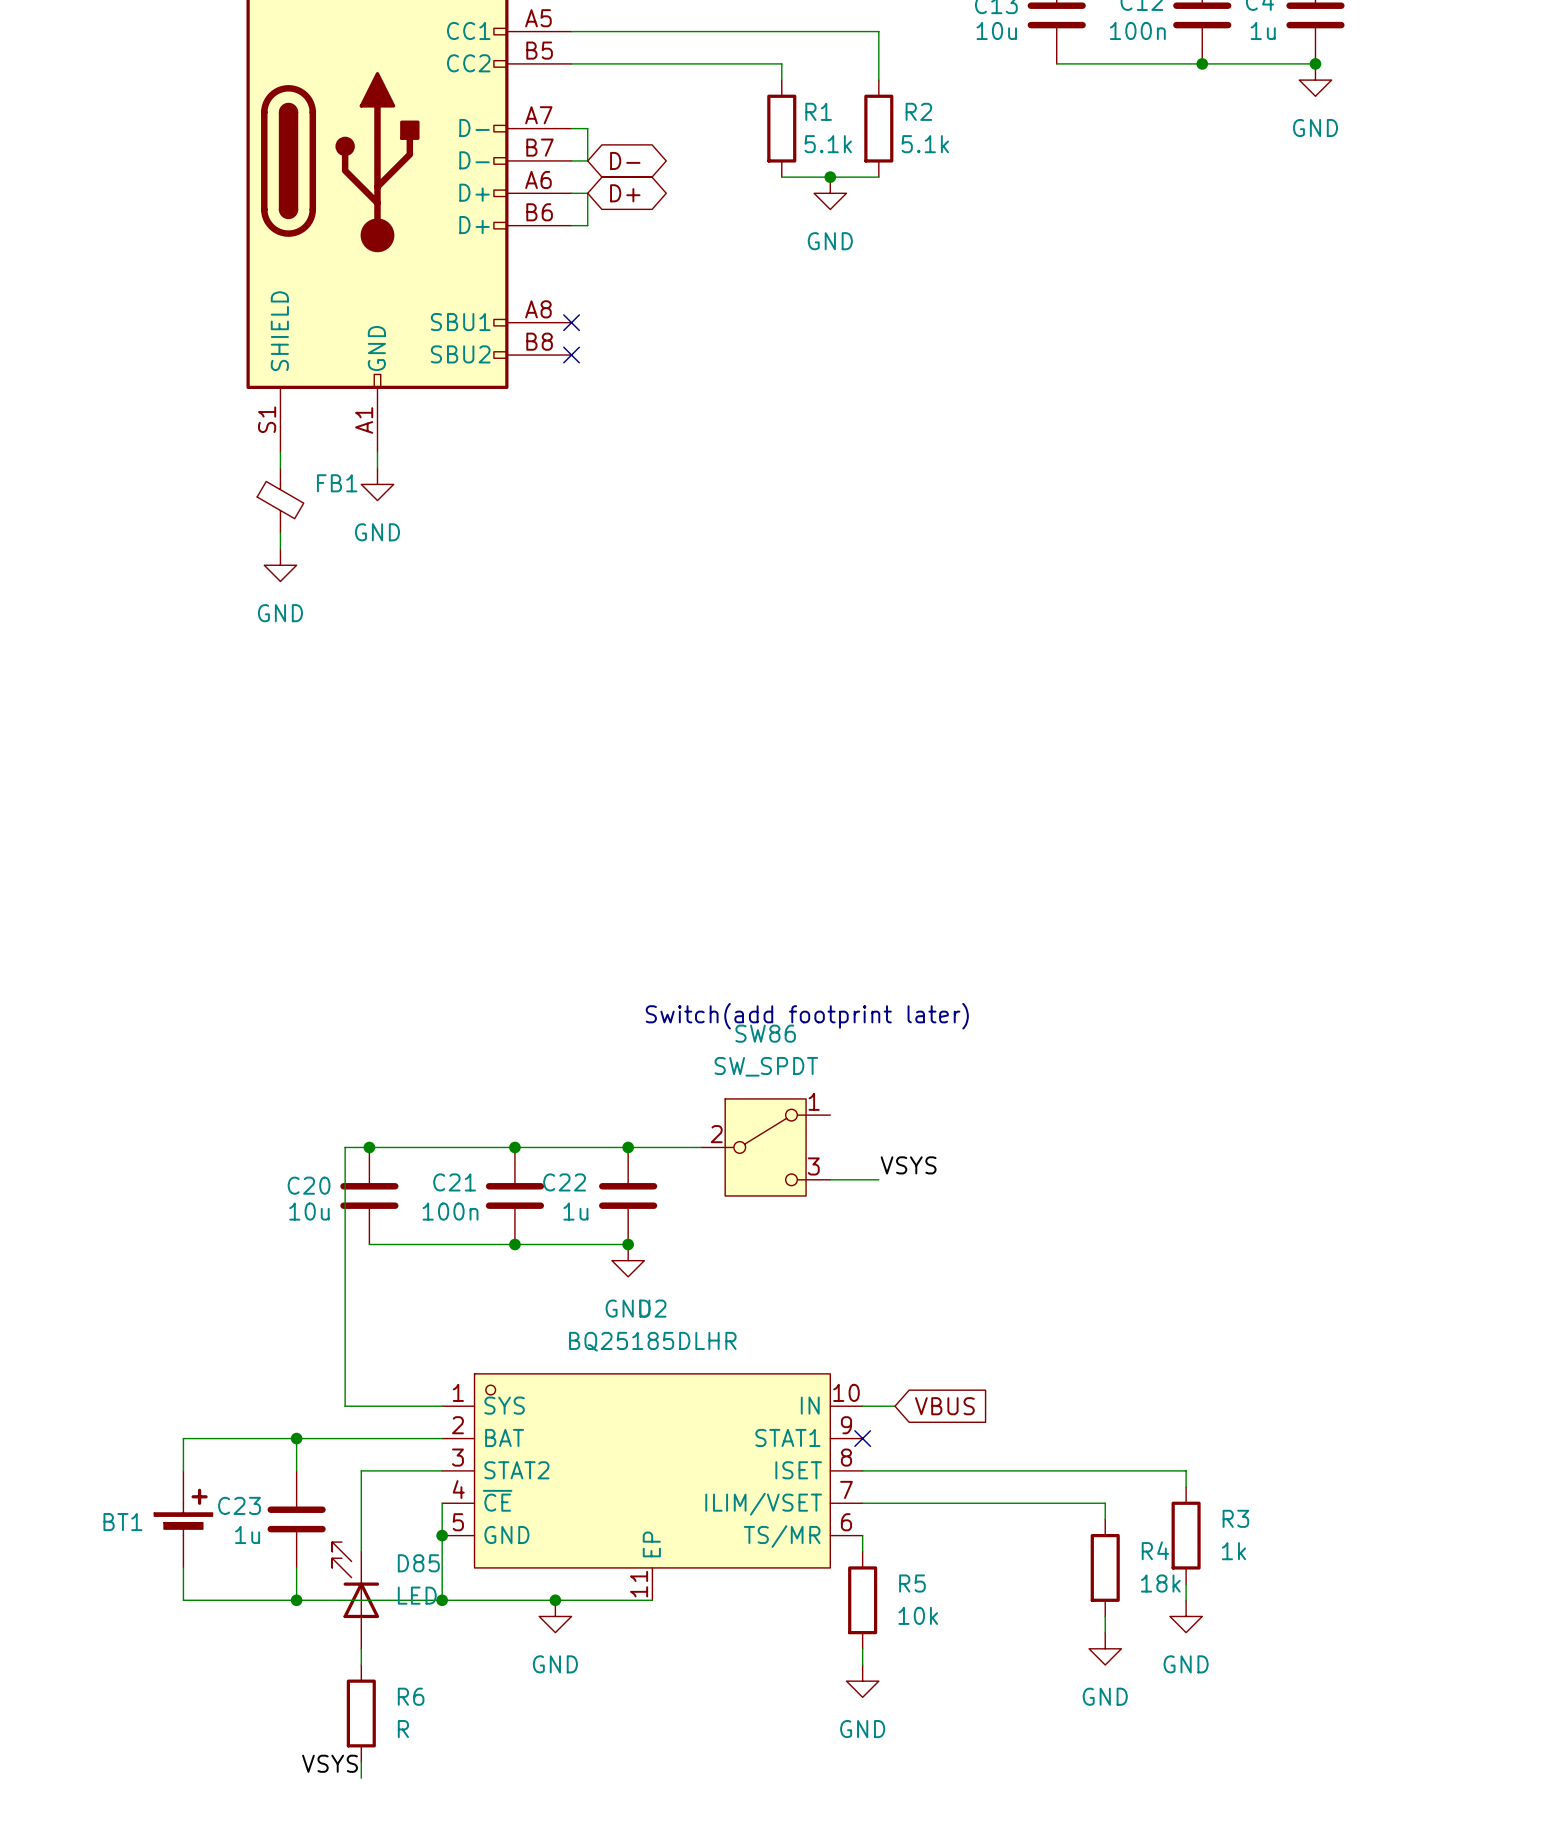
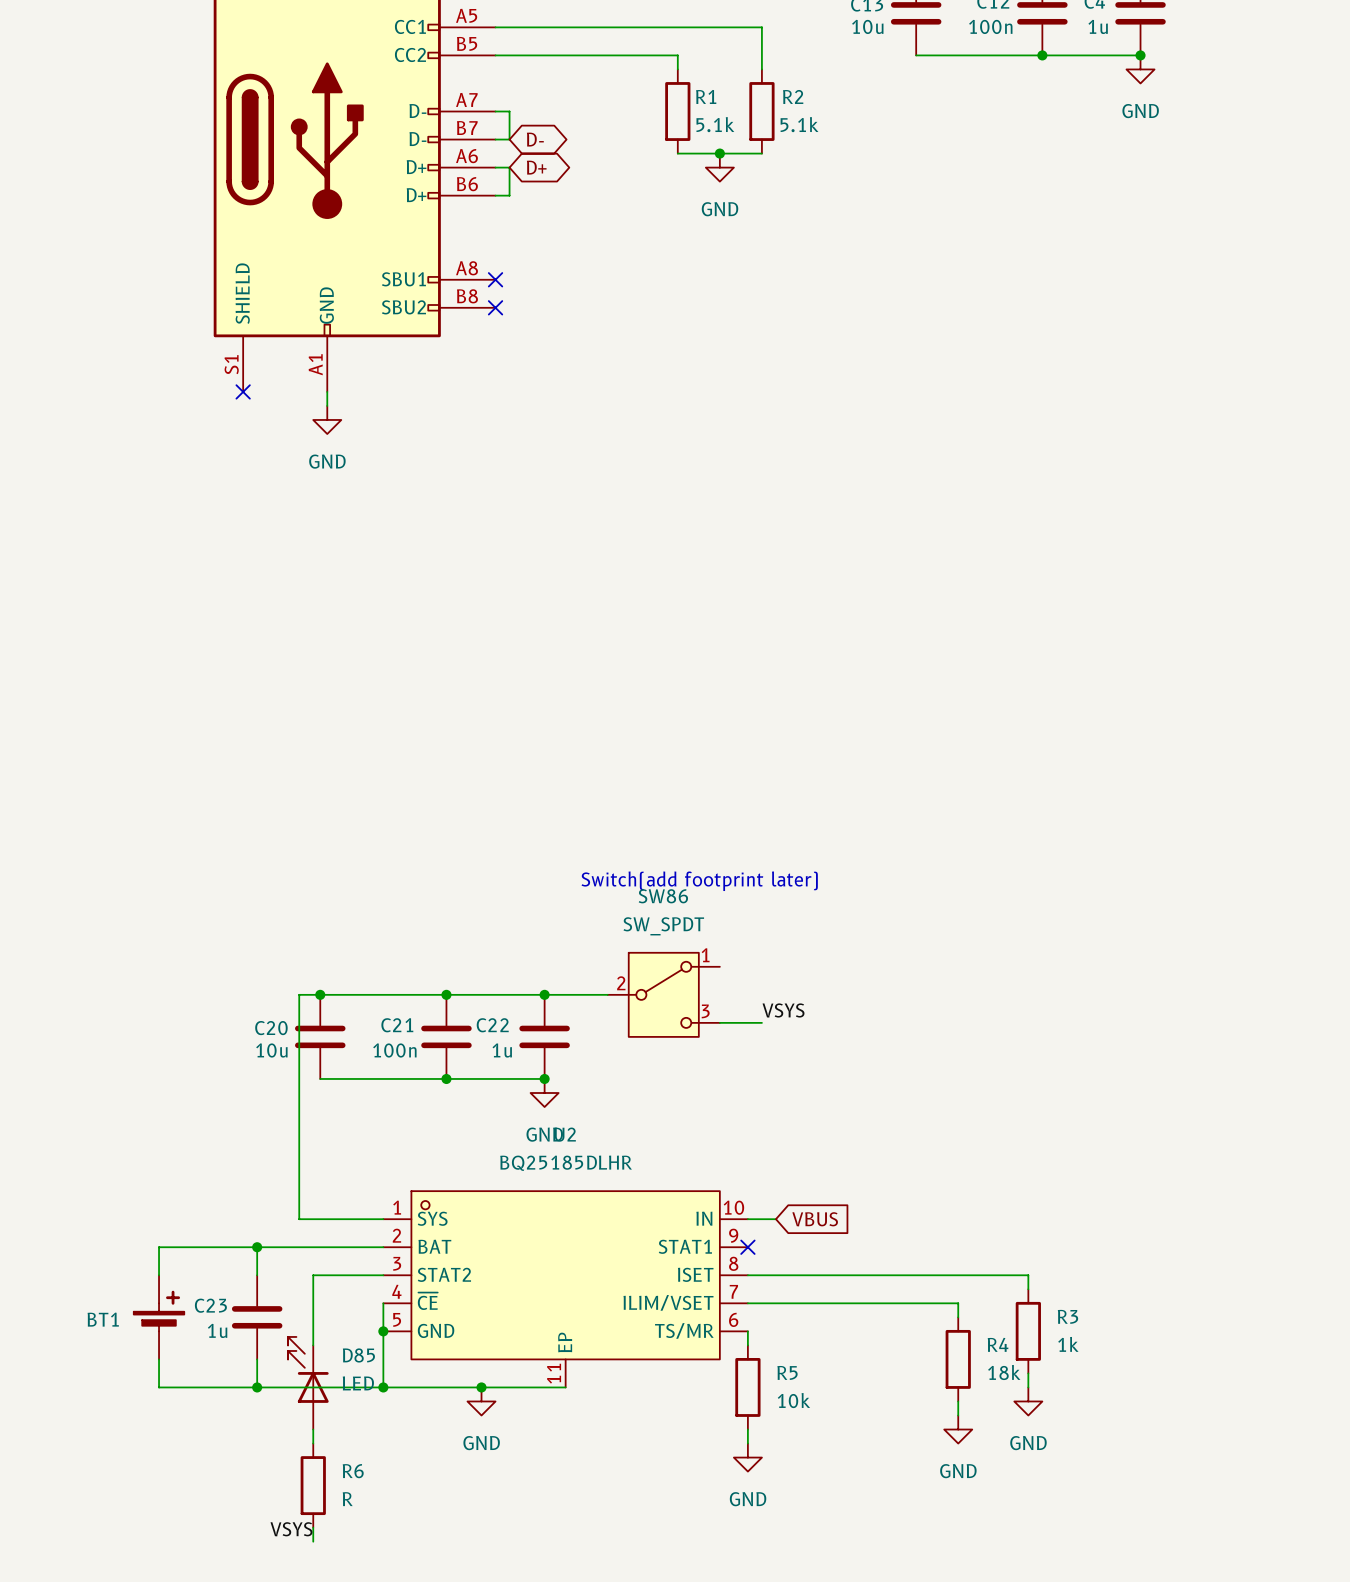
wire: (280, 452) (280, 468) -> none
no-connect mark: none -> (243, 391)
FB1: (280, 500) -> none
wire: (280, 532) (280, 549) -> none
power symbol: GND (280, 565) -> none

